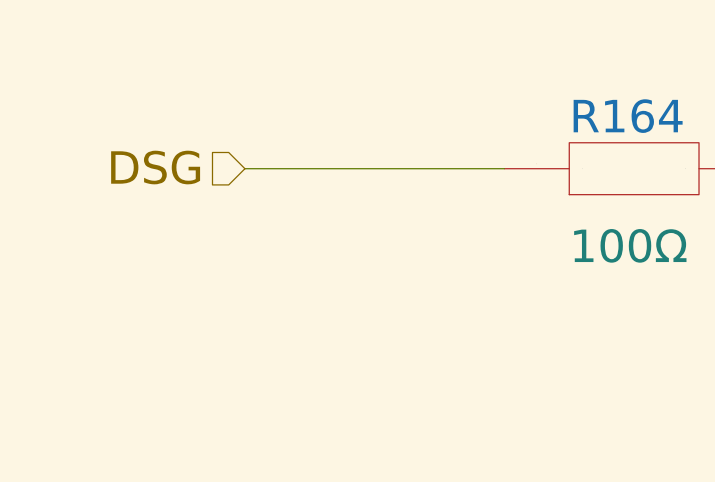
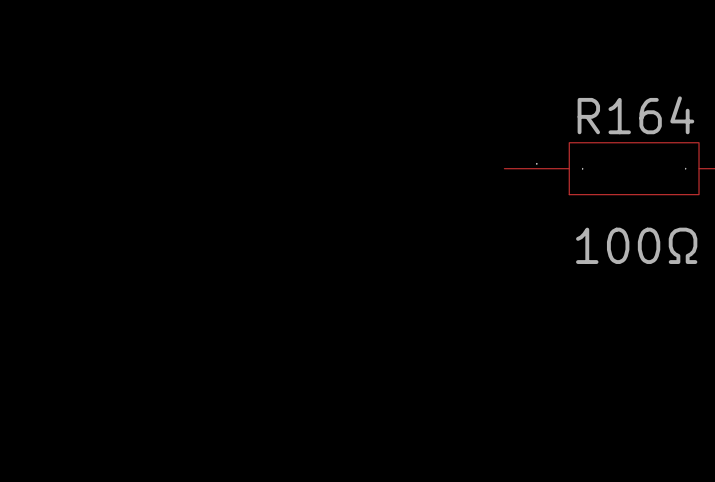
hierarchical label: DSG (155, 167) -> none
wire: (244, 168) (504, 168) -> none

